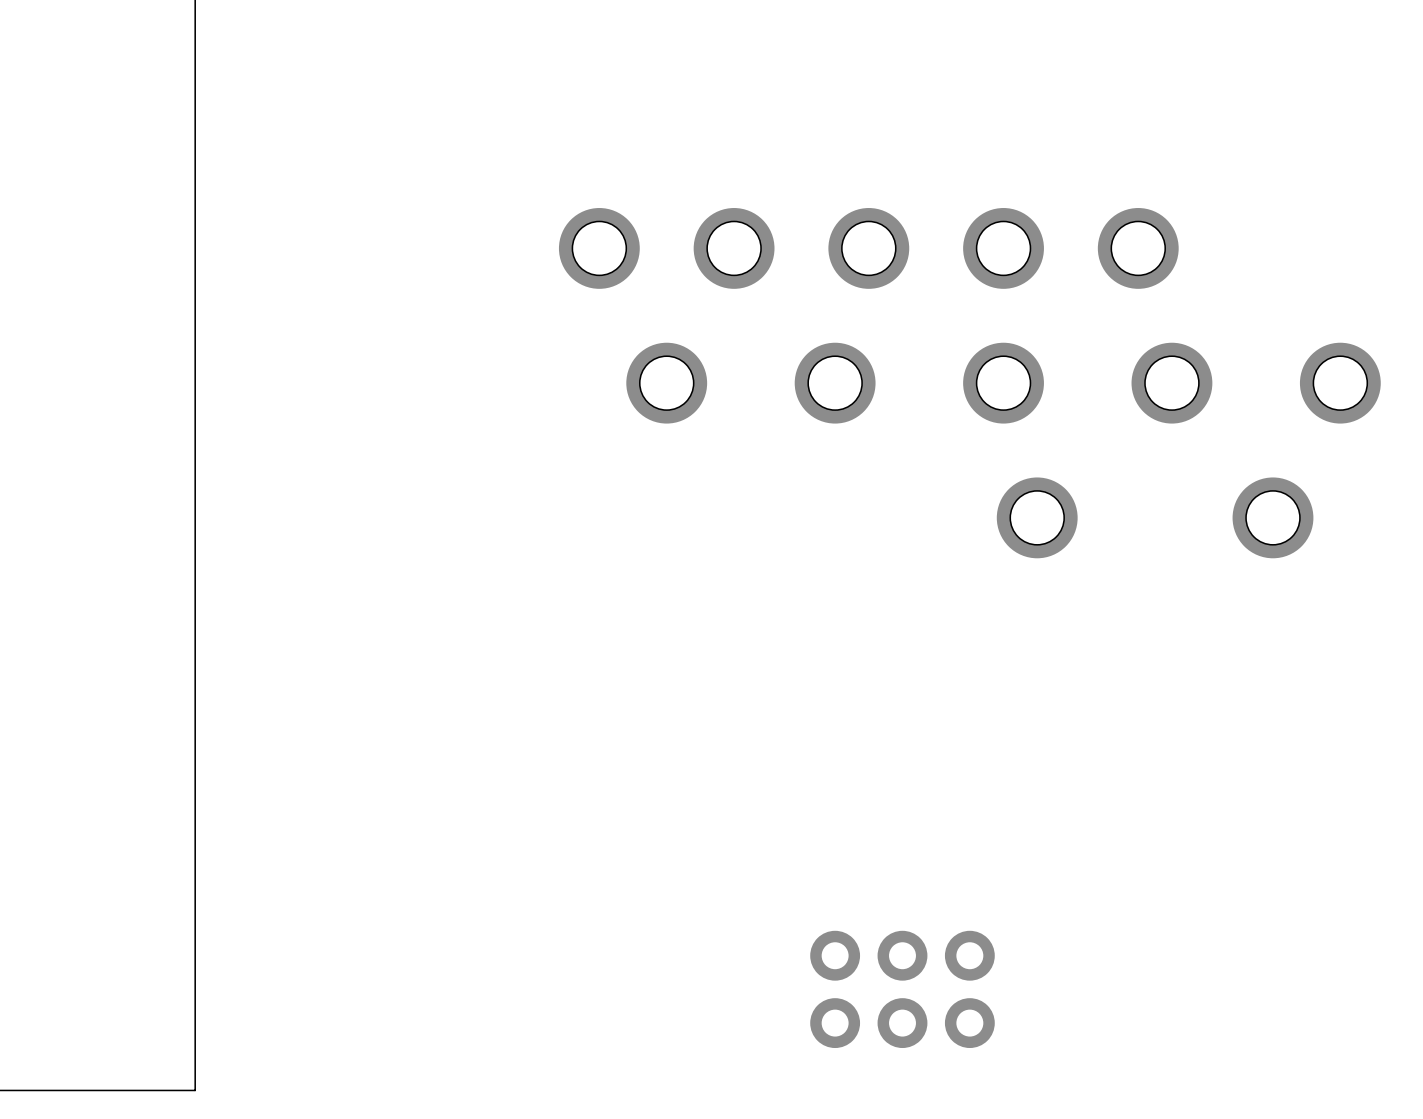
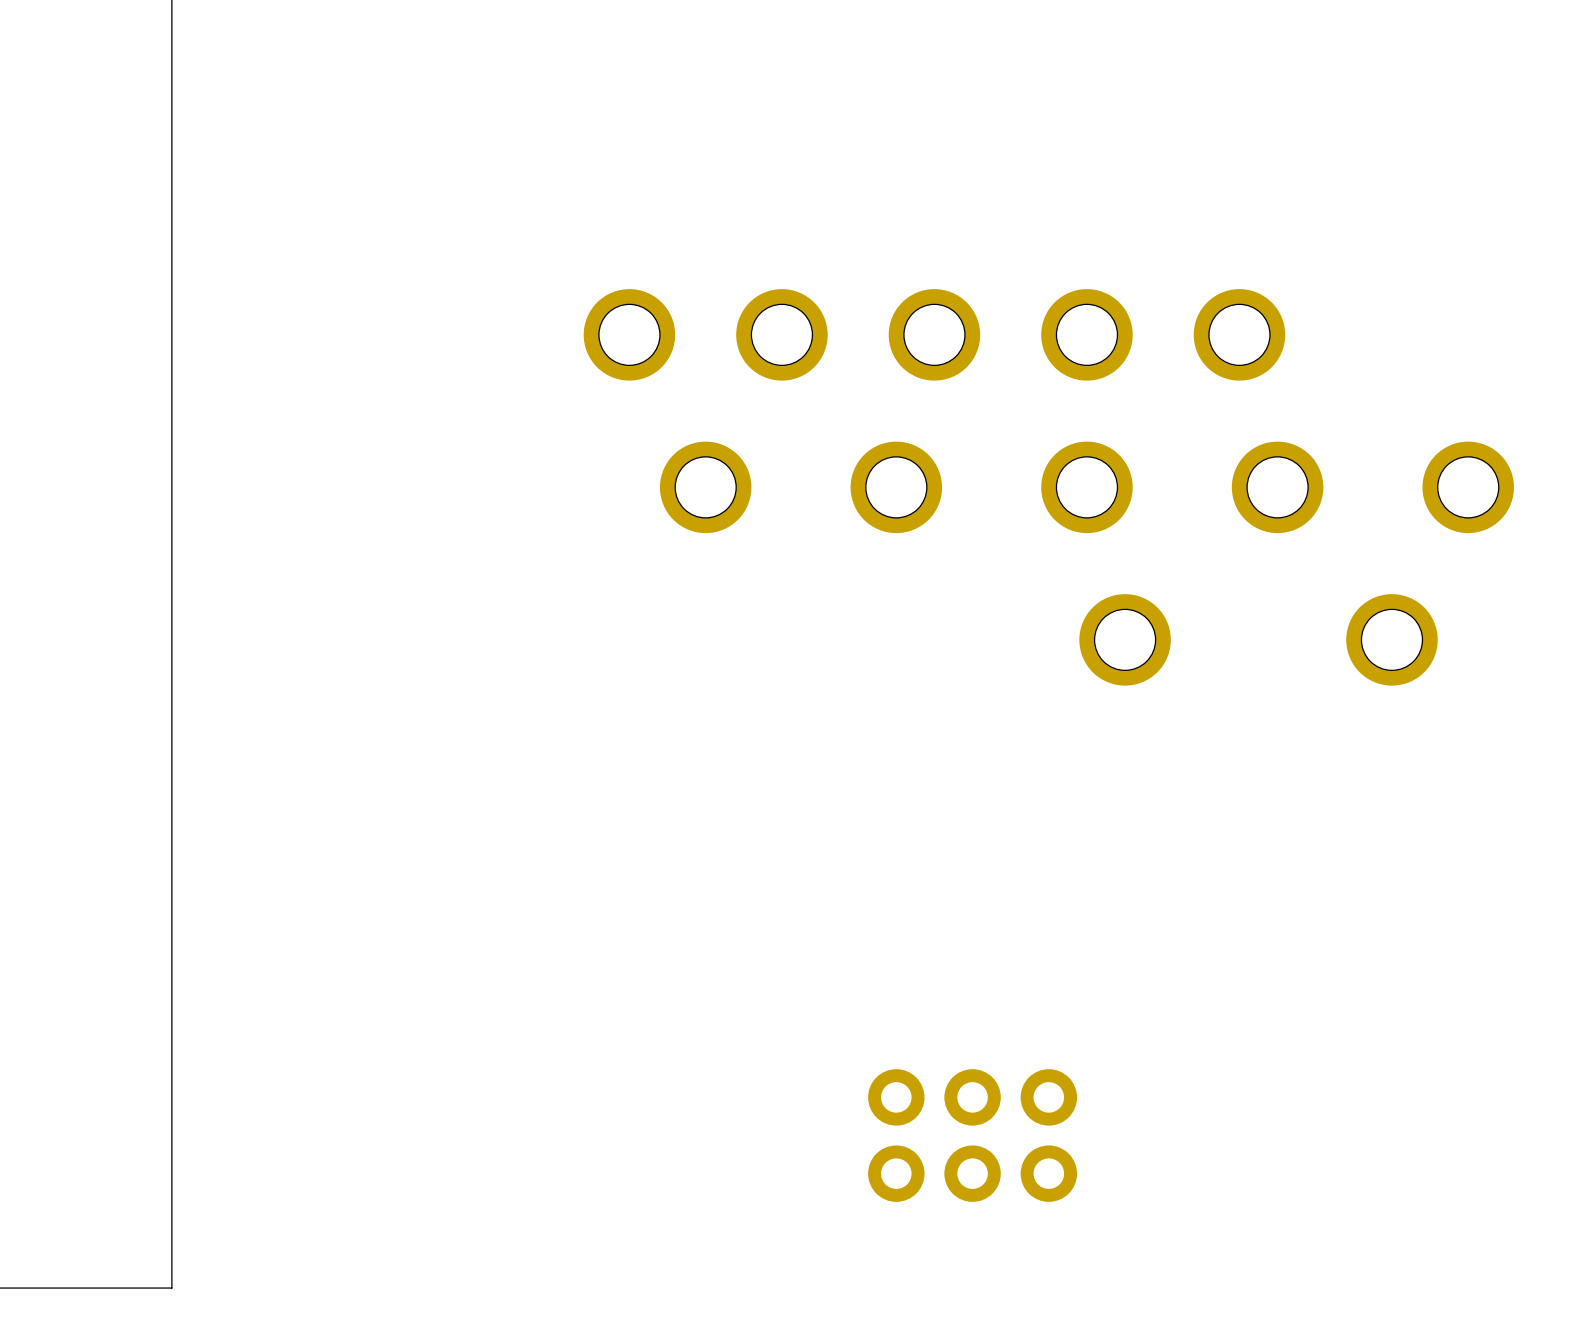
part position: (902, 989) -> (972, 1135)

